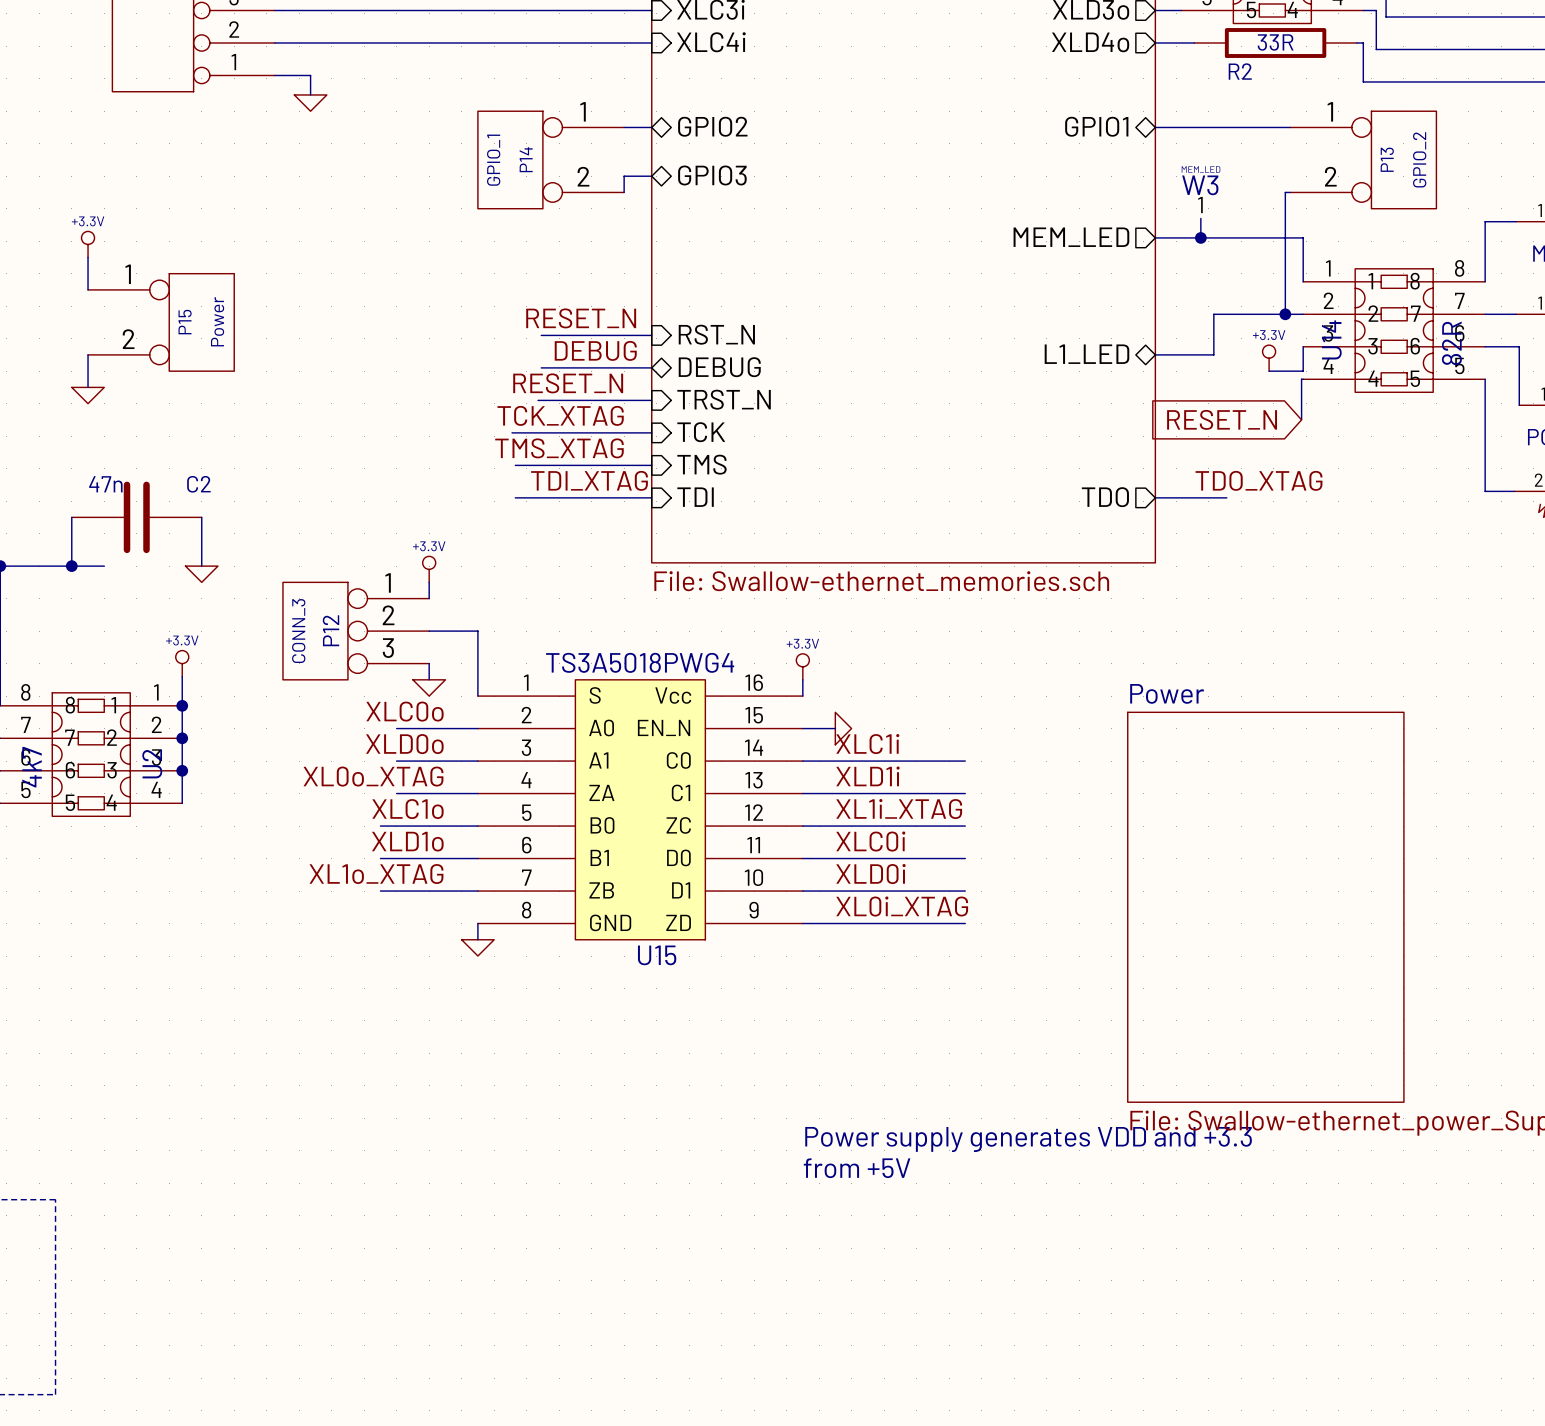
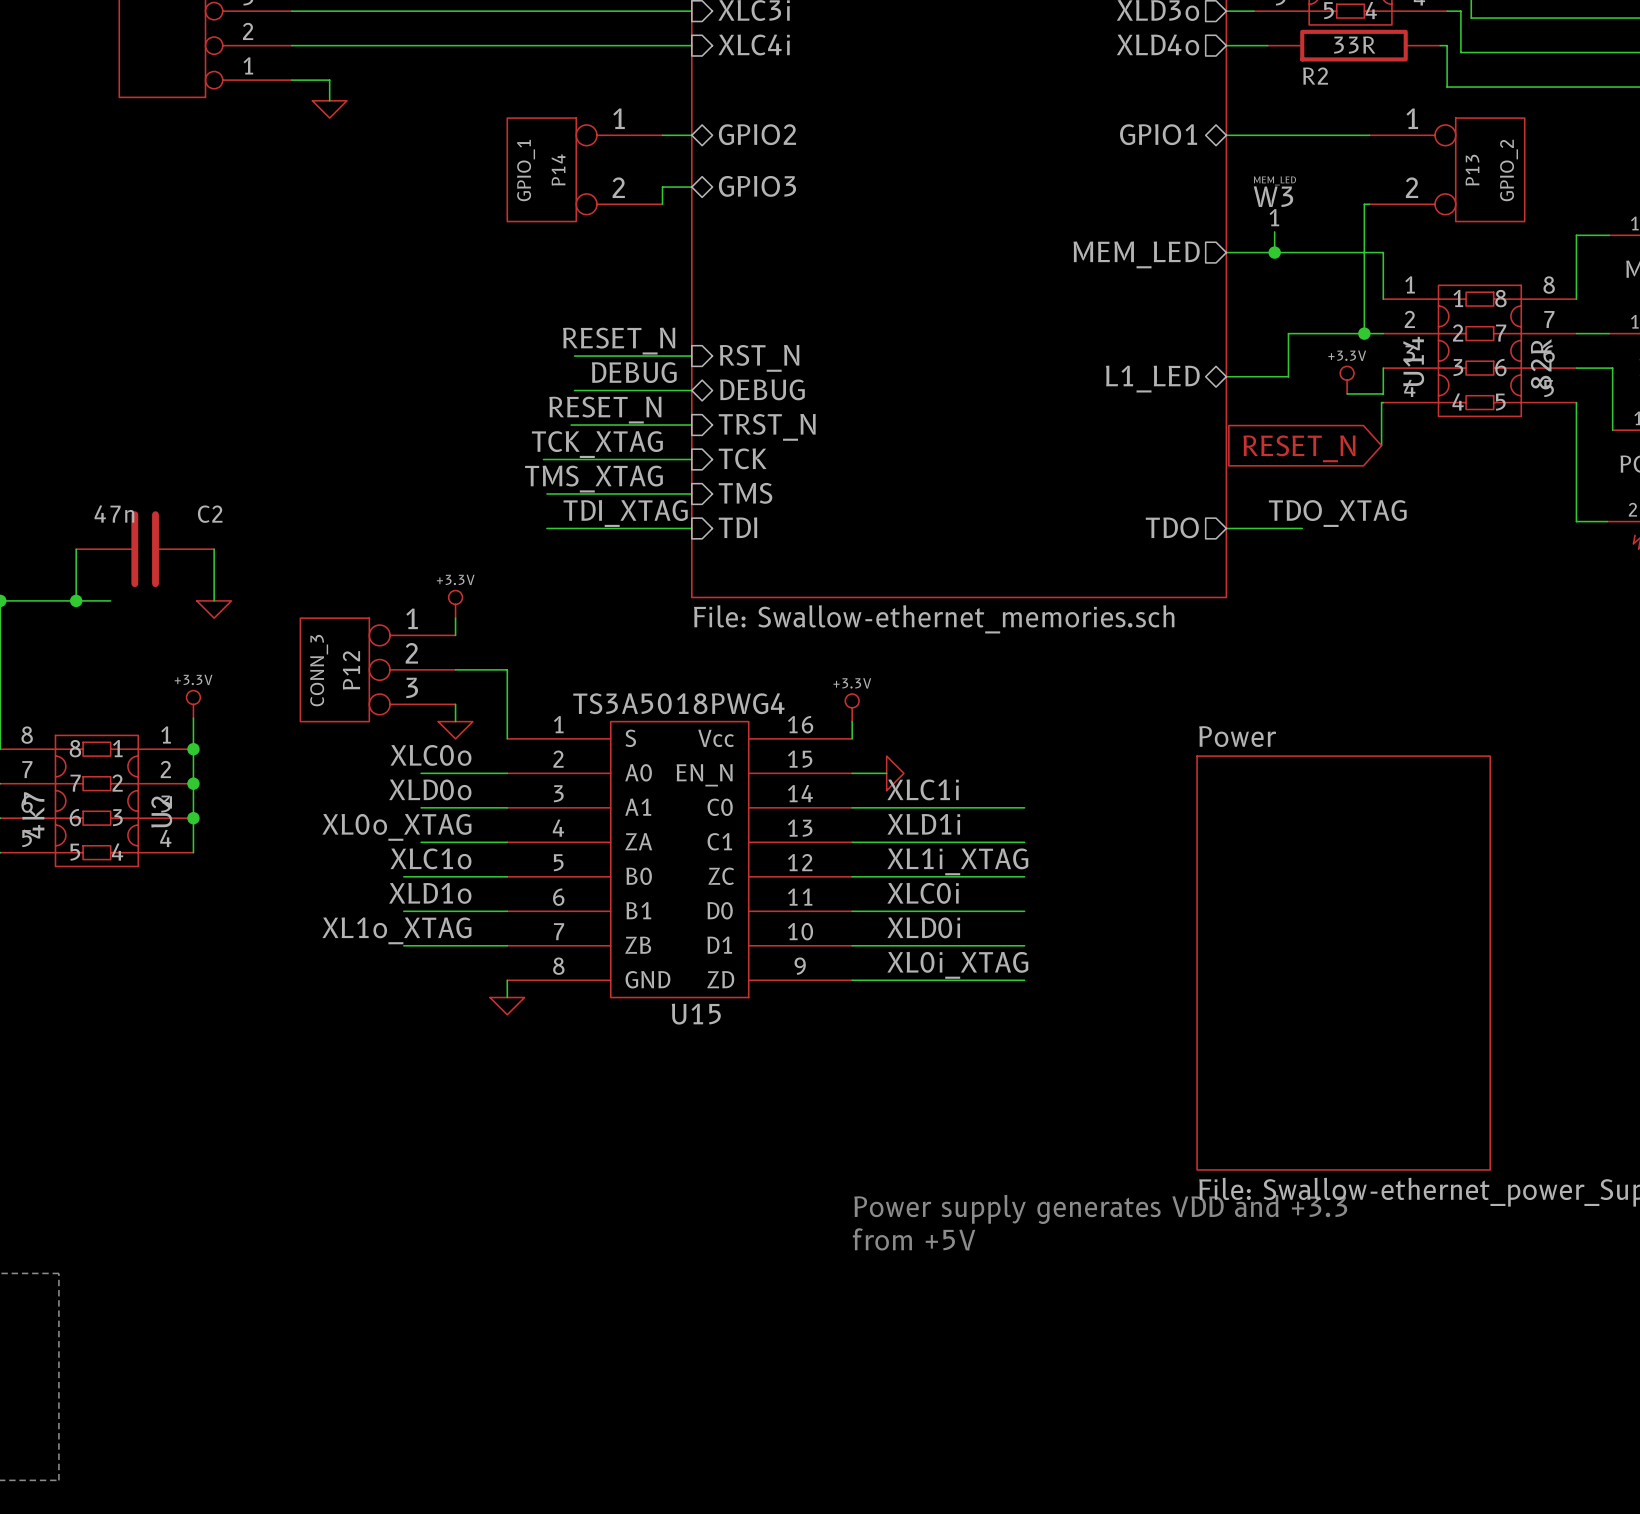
power symbol: +3.3V (88, 244) -> none
wire: (88, 257) (88, 289) -> none
P15: Power (161, 322) -> none
wire: (88, 354) (88, 387) -> none
power symbol: (88, 395) -> none

